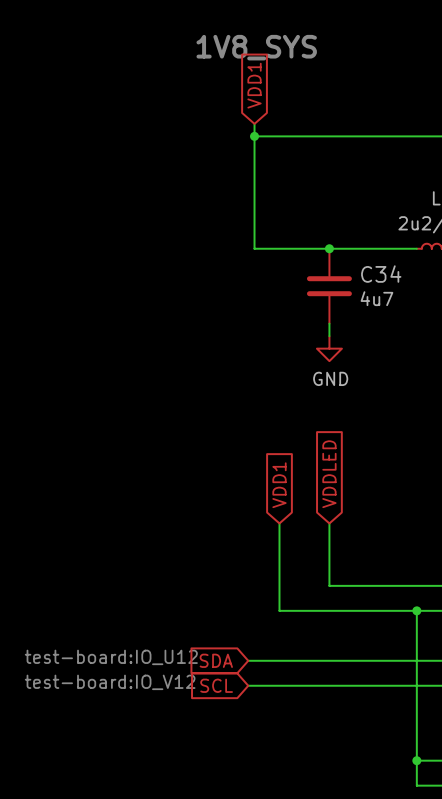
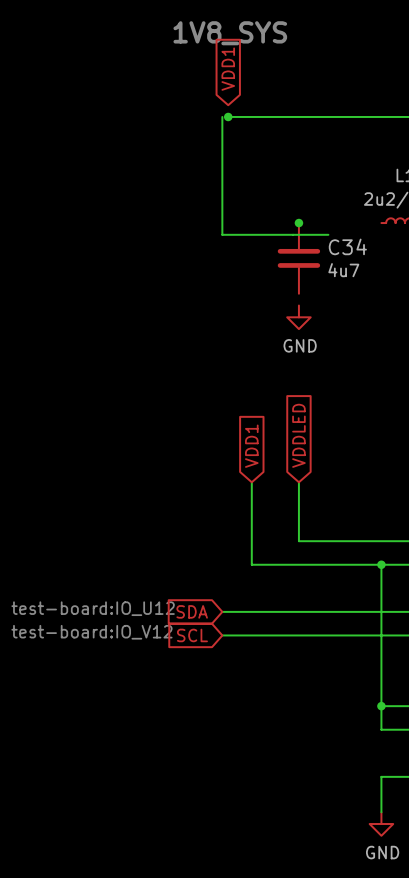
wire: (254, 123) (254, 248) (416, 248) -> none
wire: none -> (222, 116) (222, 234) (328, 234)
wire: (329, 323) (329, 336) -> none

